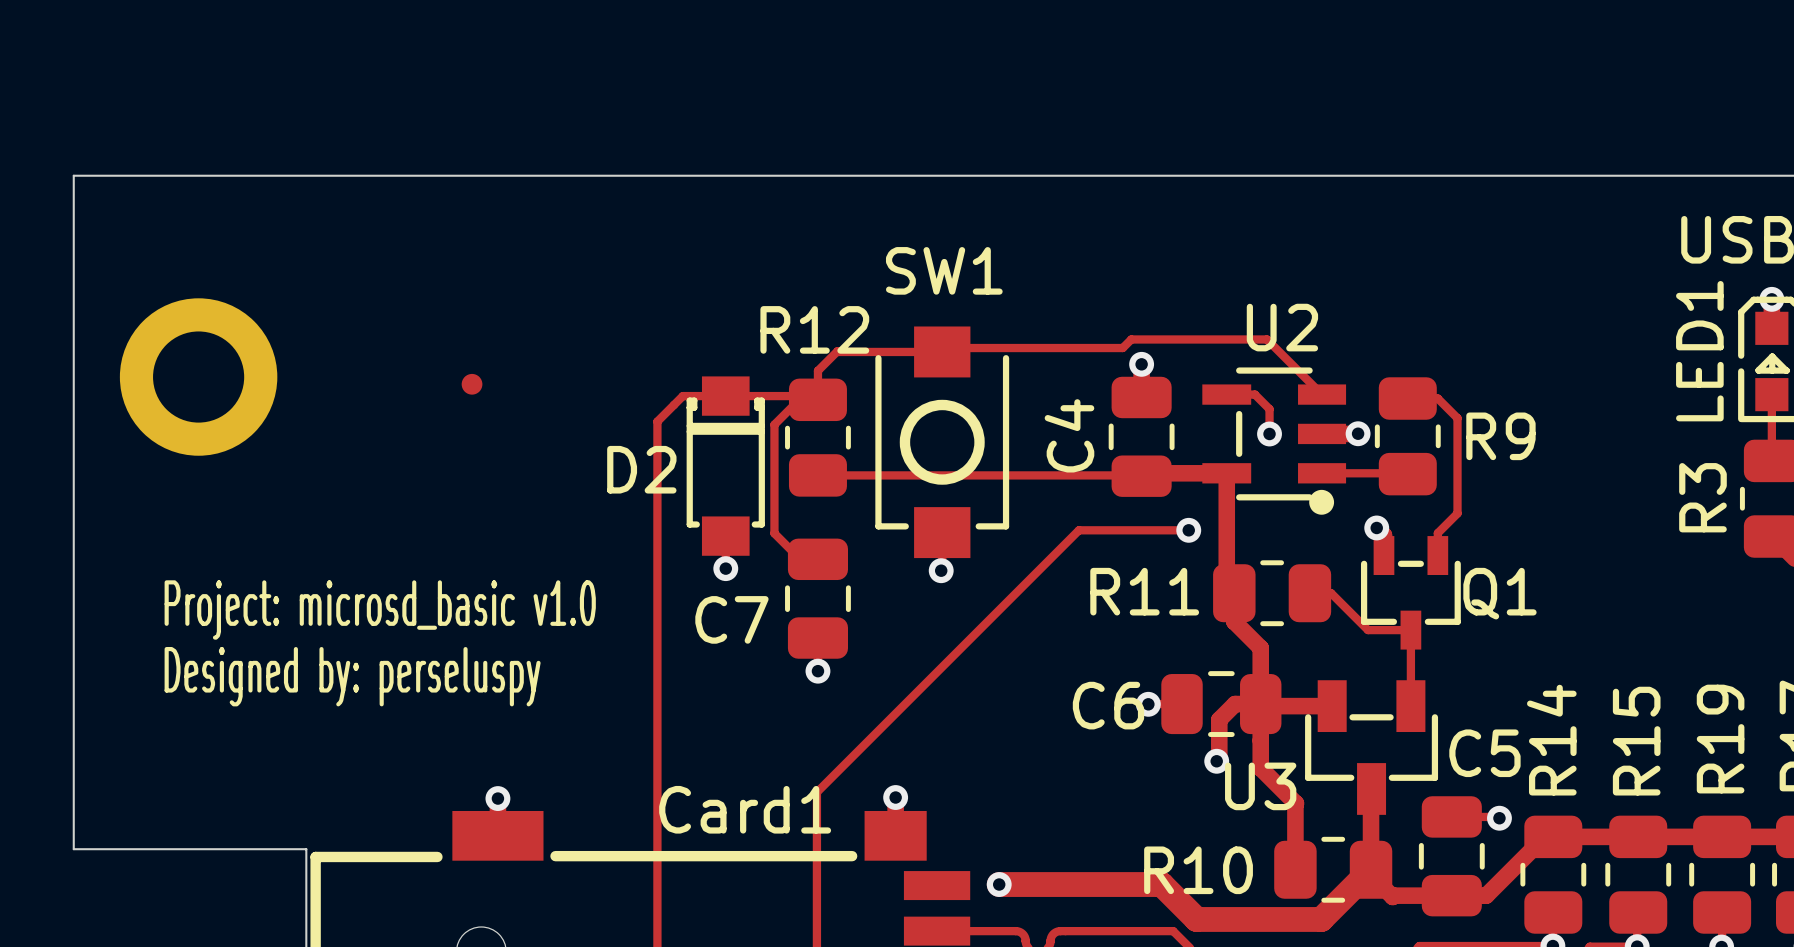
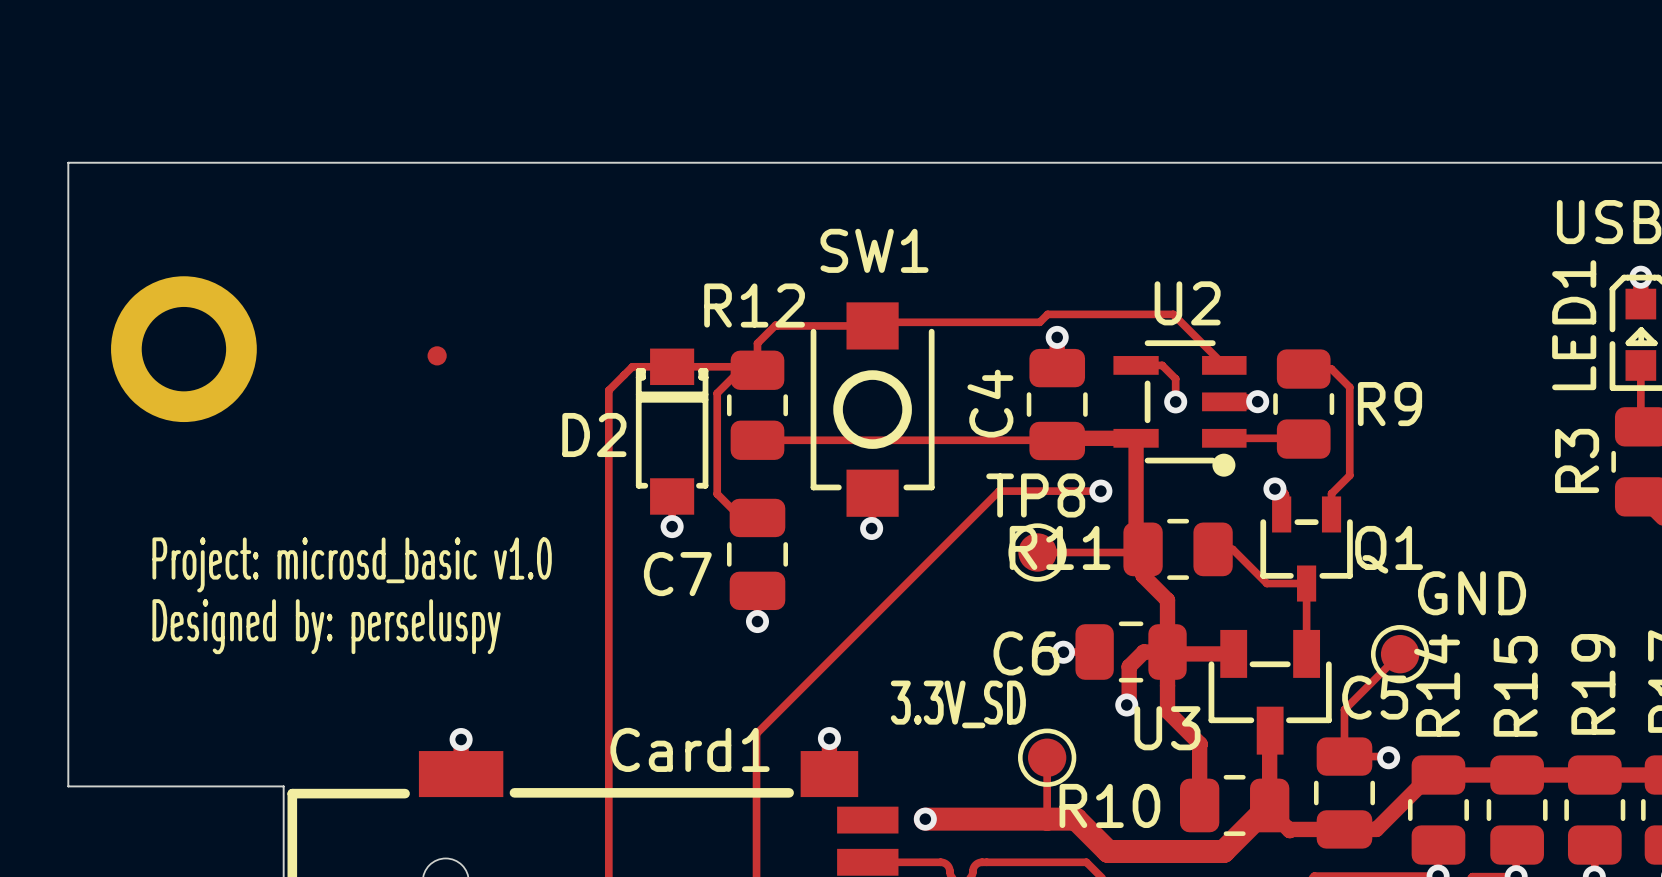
track: none -> (1143, 549) (1139, 552) (1037, 552)
TP8: none -> (1037, 552)
track: none -> (1400, 654) (1344, 709) (1344, 756)
GND: none -> (1400, 654)
track: none -> (1047, 757) (1047, 819)
3.3V_SD: none -> (1047, 757)

